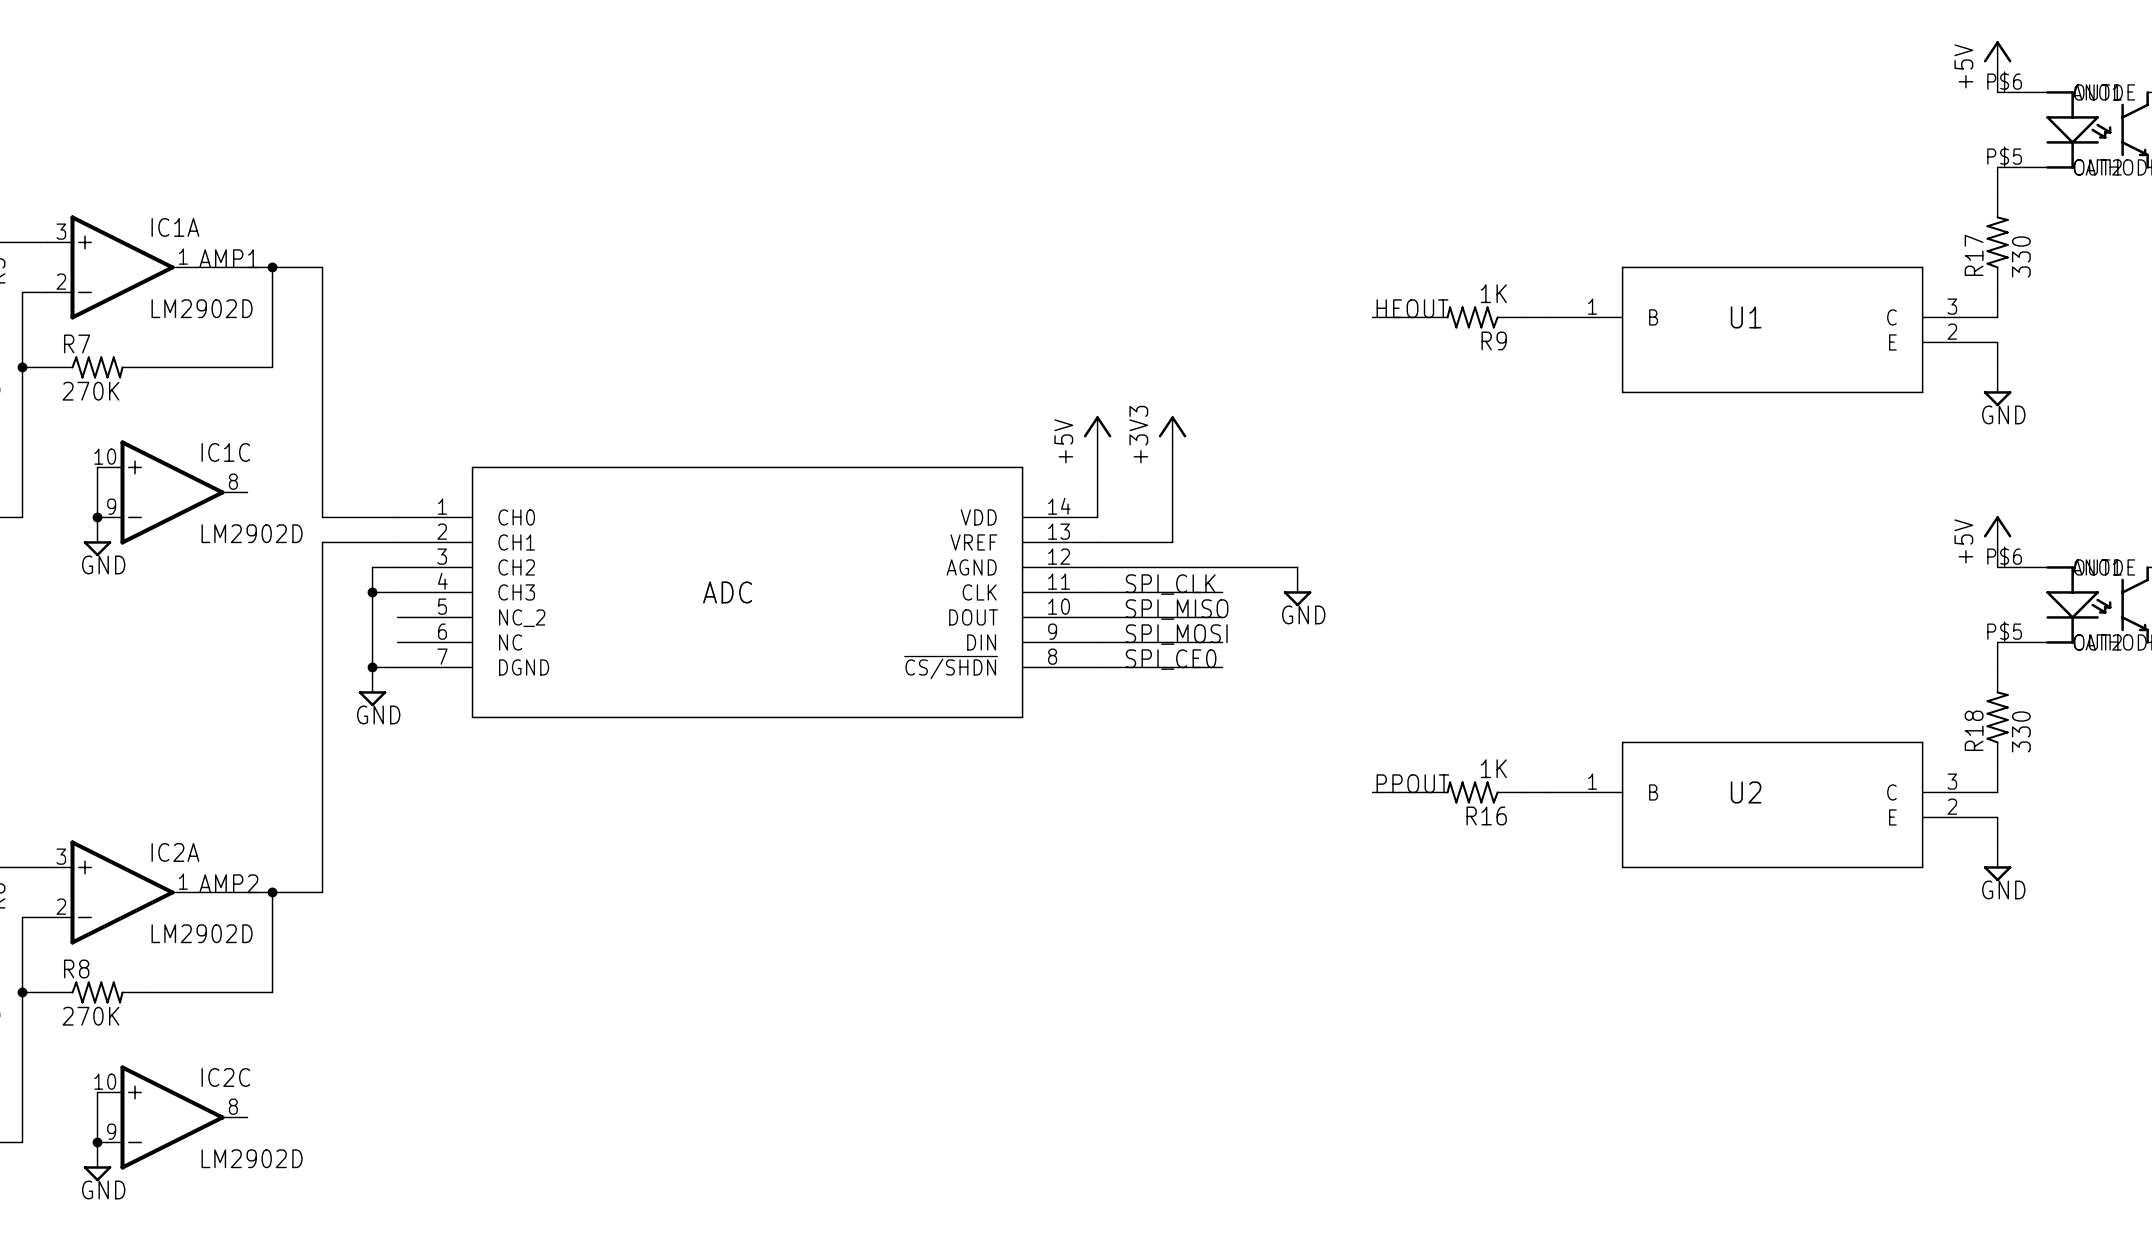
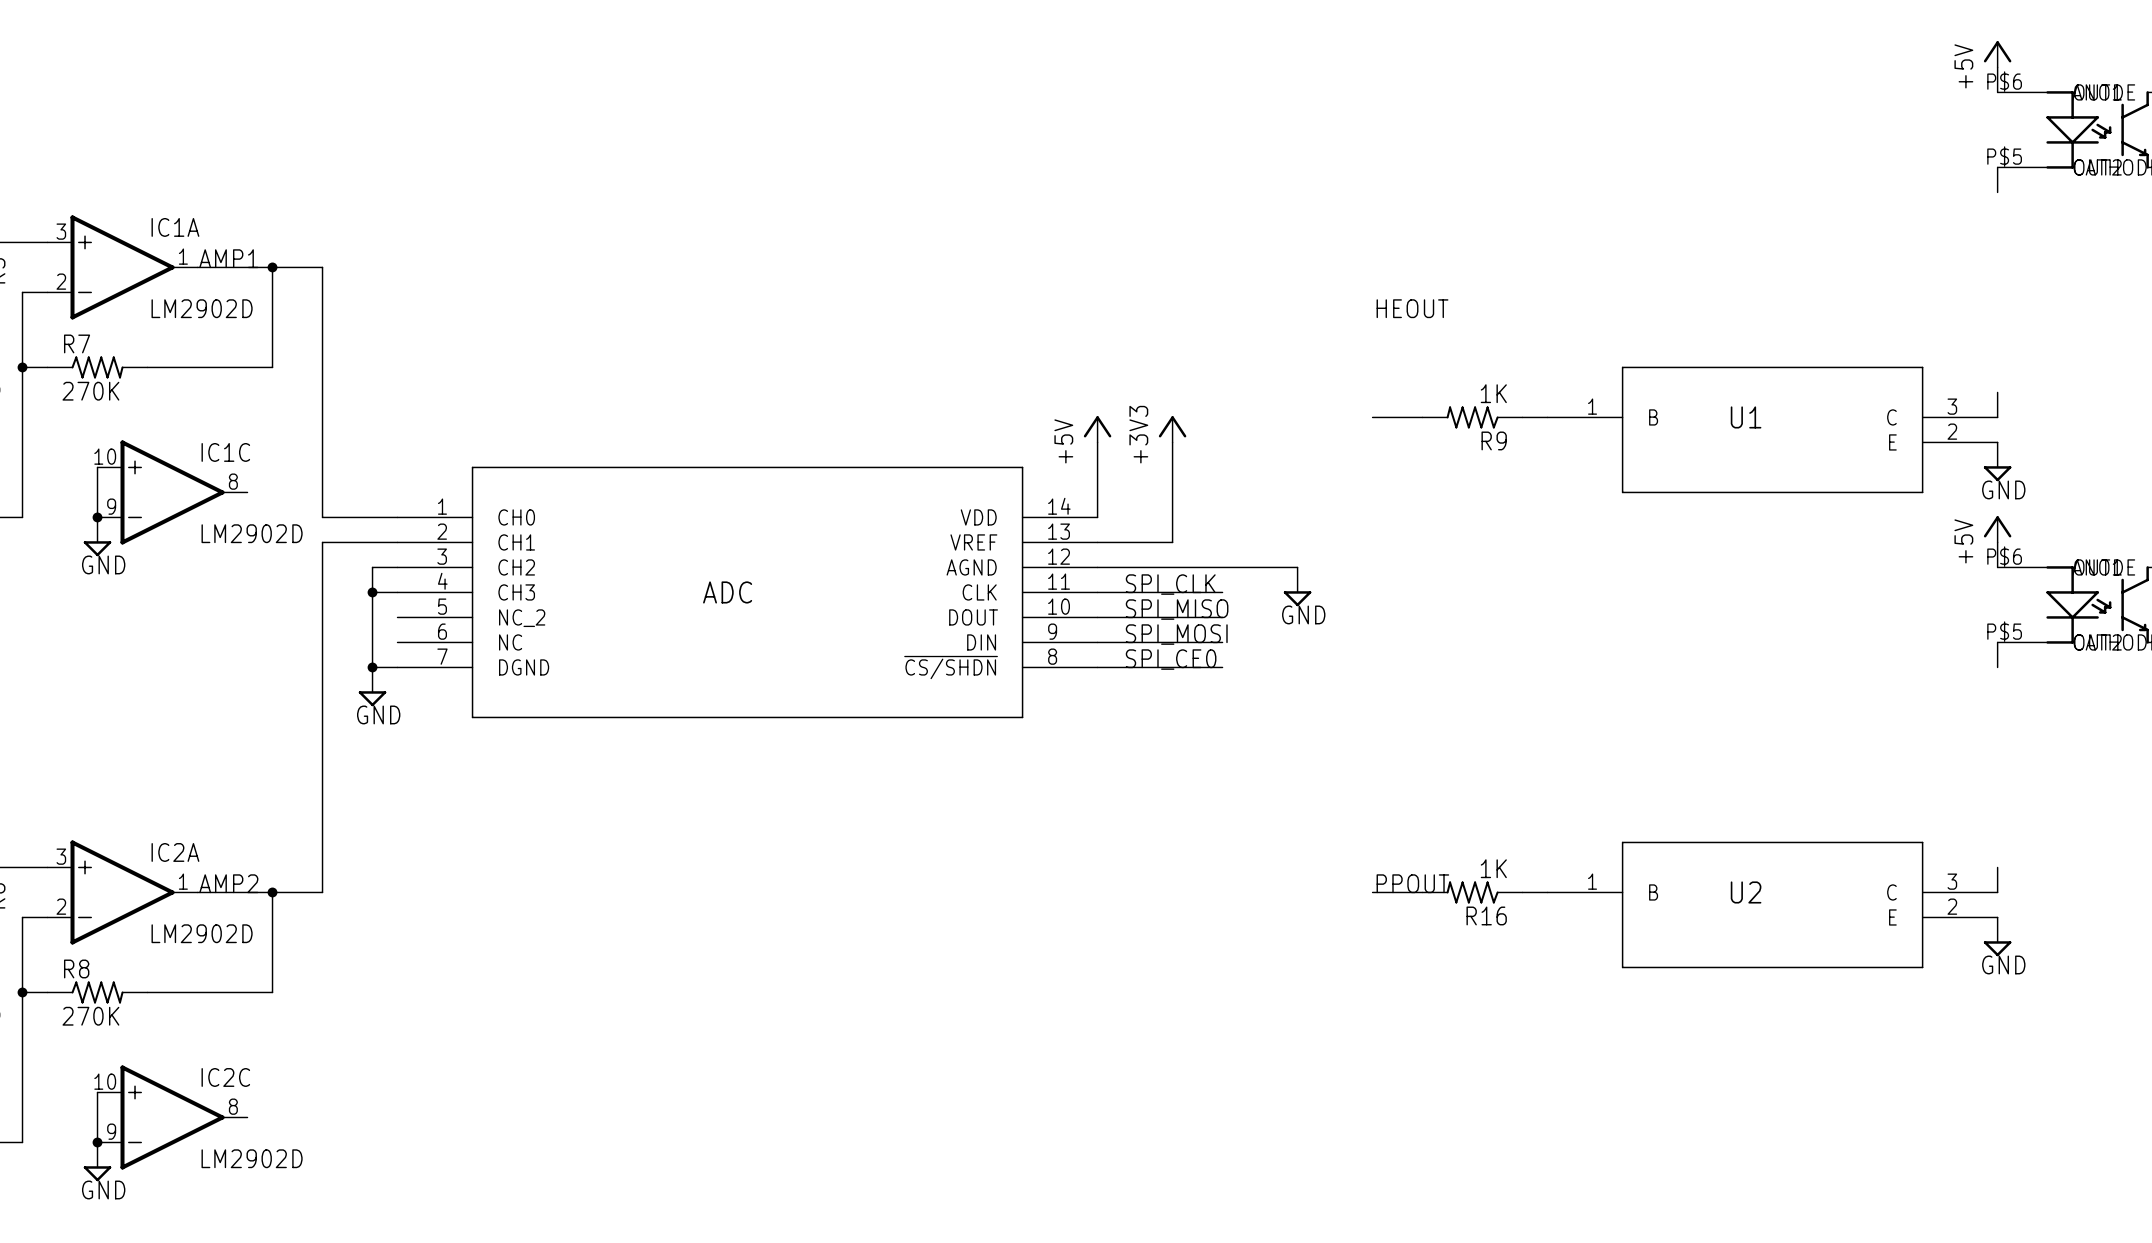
R17: 330 (1997, 242) -> none
wire: (1997, 292) (1997, 317) -> (1997, 392) (1997, 417)
wire: (1372, 317) (1422, 317) -> (1372, 417) (1422, 417)
R9 position: (1472, 317) -> (1472, 417)
wire: (1522, 317) (1547, 317) -> (1522, 417) (1547, 417)
U1 position: (1772, 329) -> (1772, 429)
wire: (1997, 342) (1997, 367) -> none
power symbol position: GND (1997, 386) -> GND (1997, 461)
R18: 330 (1997, 717) -> none
wire: (1997, 767) (1997, 792) -> (1997, 867) (1997, 892)
label position: PPOUT (1412, 783) -> PPOUT (1412, 883)
wire: (1372, 792) (1422, 792) -> (1372, 892) (1422, 892)
R16 position: (1472, 792) -> (1472, 892)
wire: (1522, 792) (1547, 792) -> (1522, 892) (1547, 892)
U2 position: (1772, 804) -> (1772, 904)
wire: (1997, 817) (1997, 842) -> none
power symbol position: GND (1997, 861) -> GND (1997, 936)

